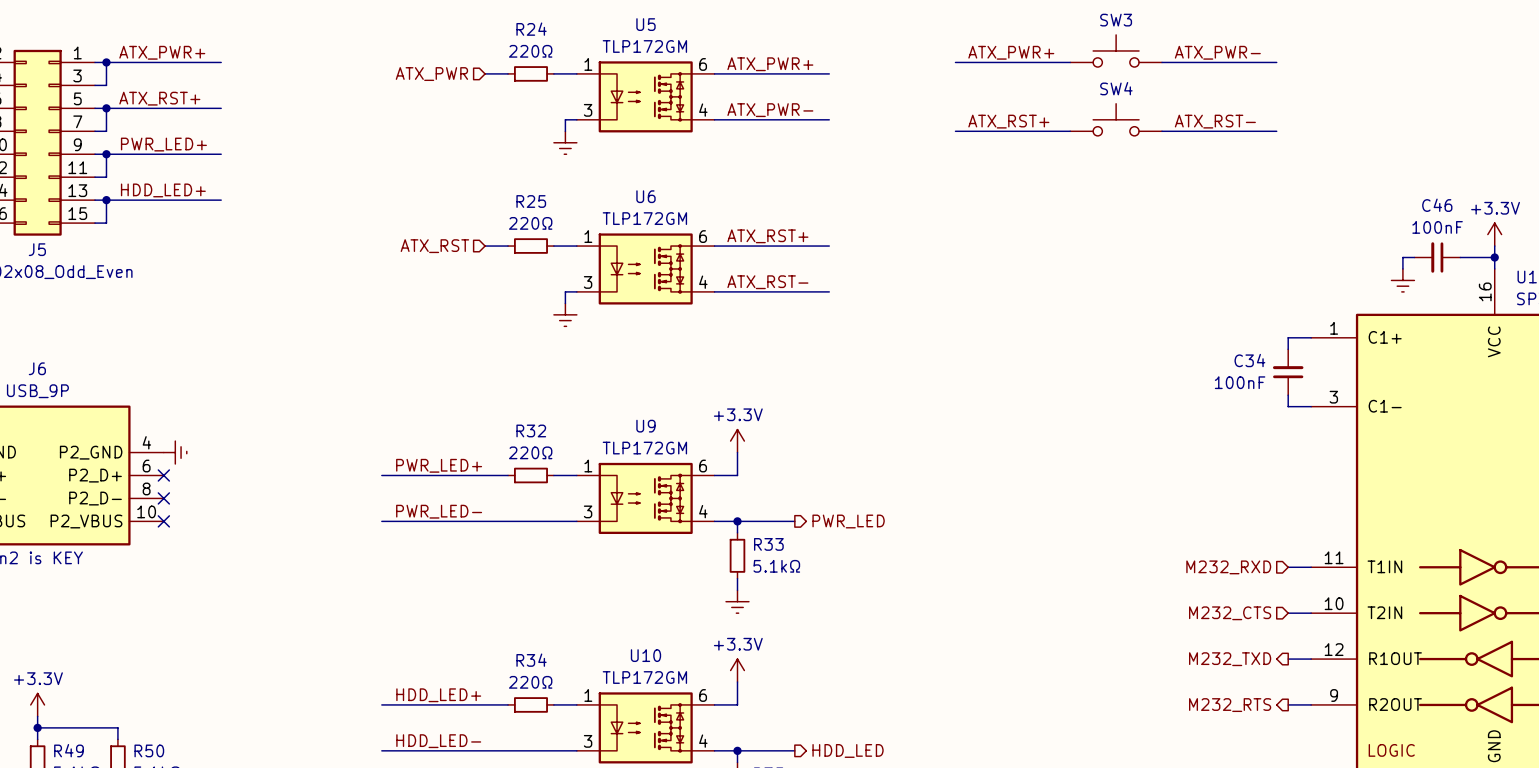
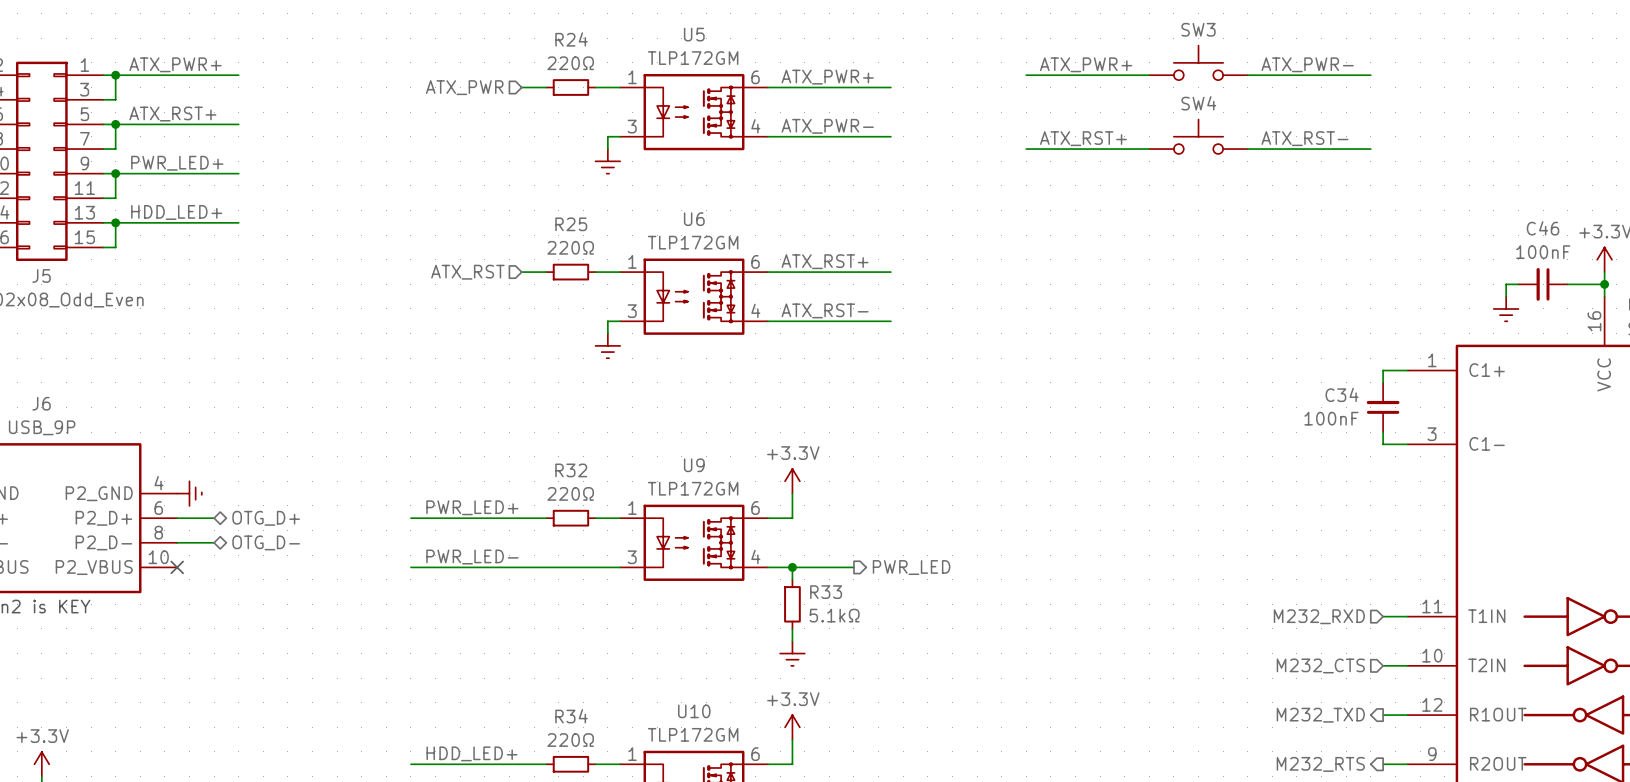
wire: none -> (177, 518) (214, 518)
no-connect mark: (163, 475) -> none
hierarchical label: none -> OTG_D+ (266, 518)
wire: none -> (177, 542) (214, 542)
no-connect mark: (163, 498) -> none
hierarchical label: none -> OTG_D- (266, 542)

